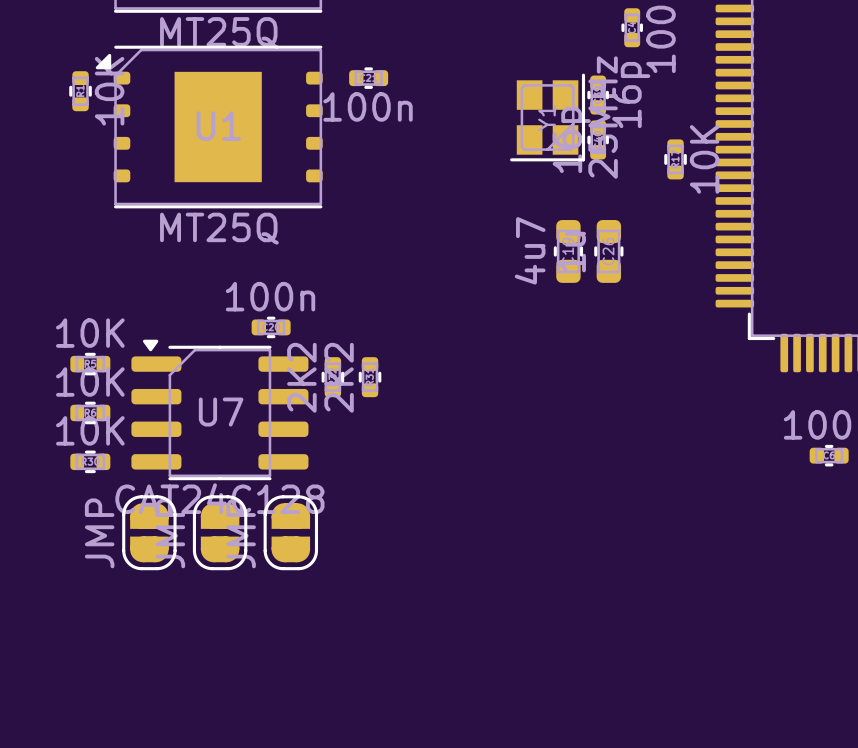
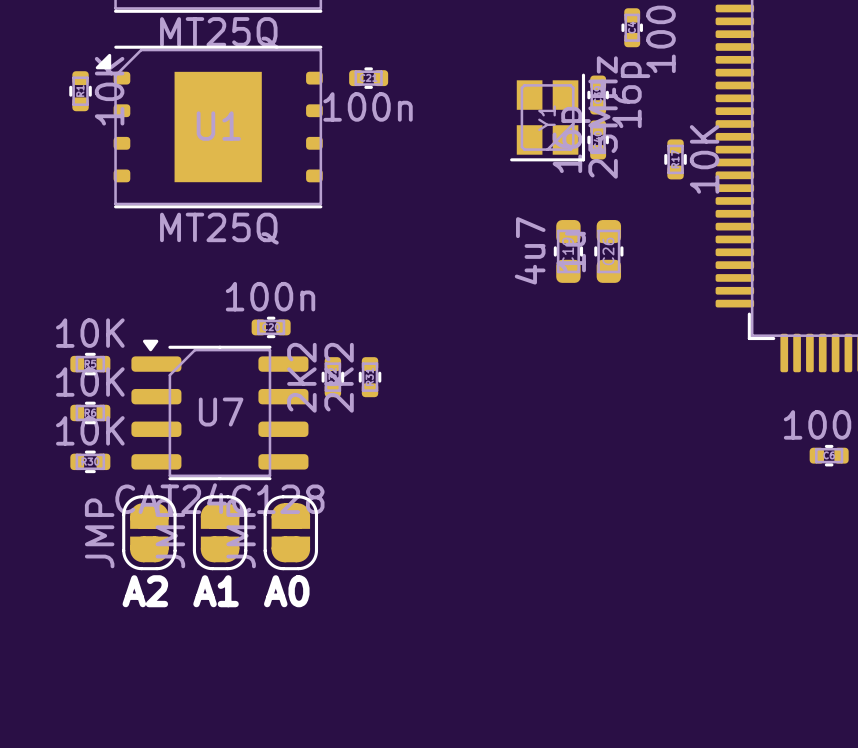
text: none -> A2 (145, 591)
text: none -> A1 (216, 591)
text: none -> A0 (286, 591)

